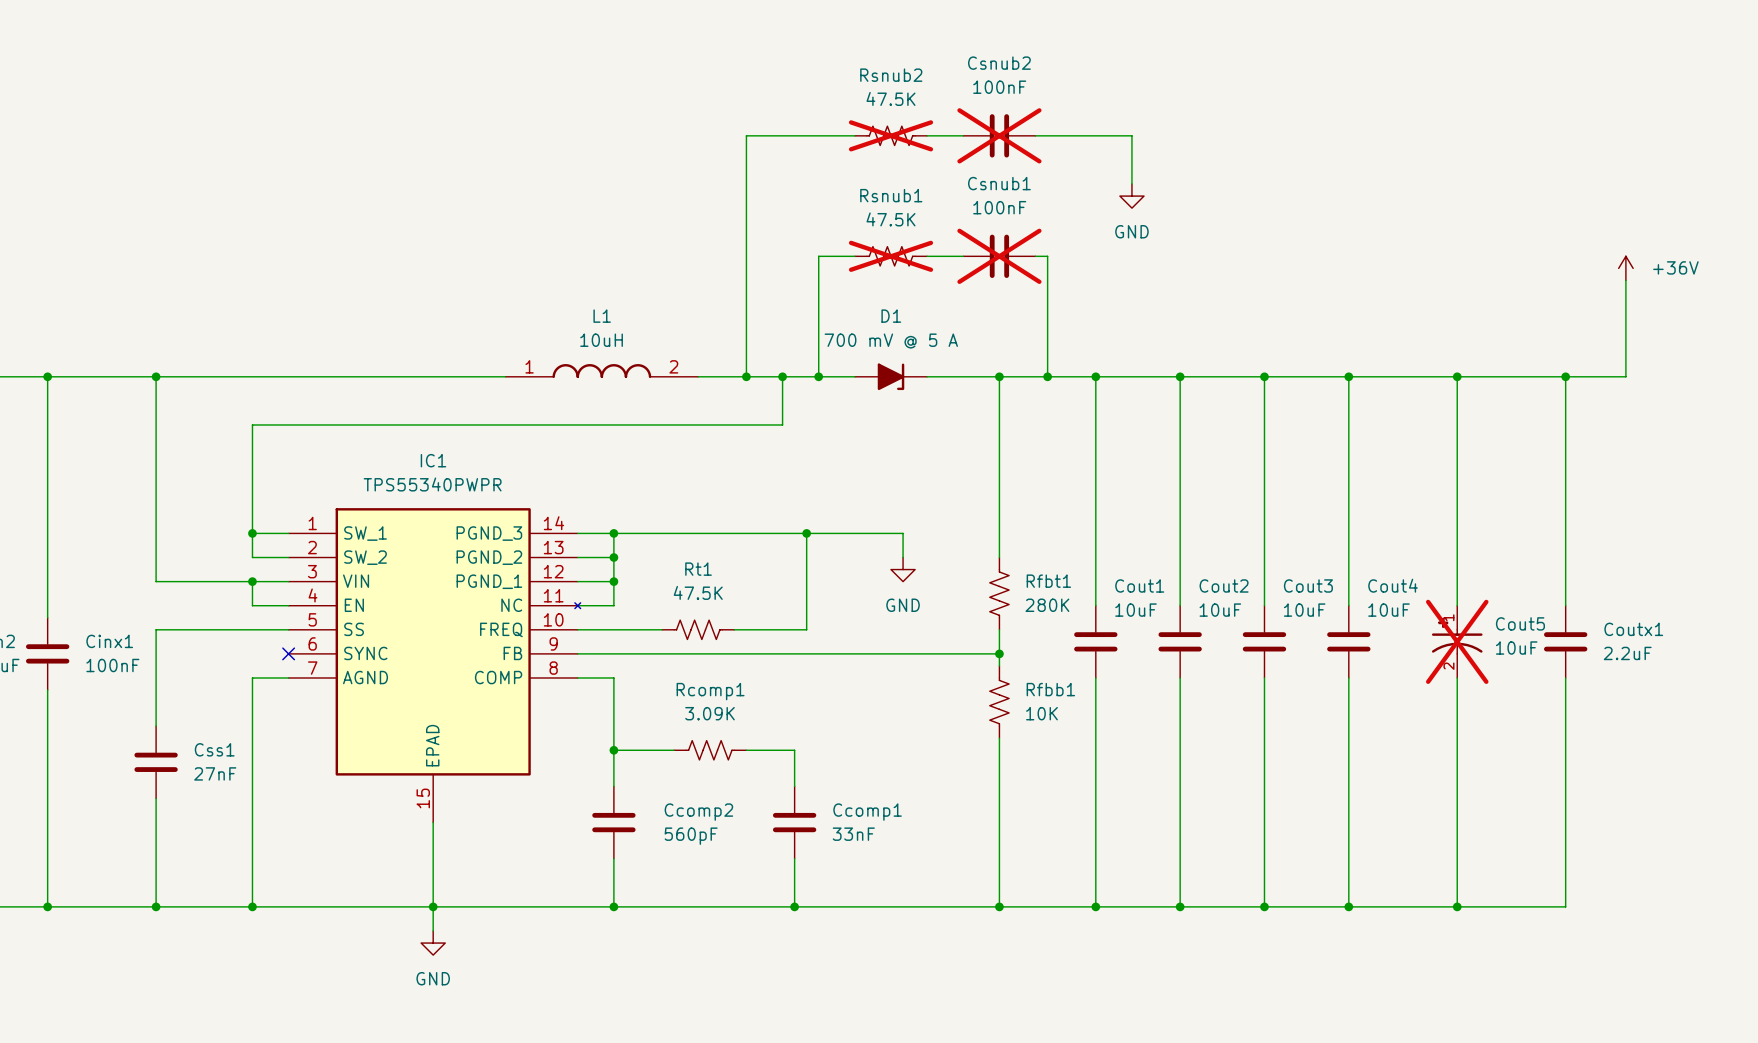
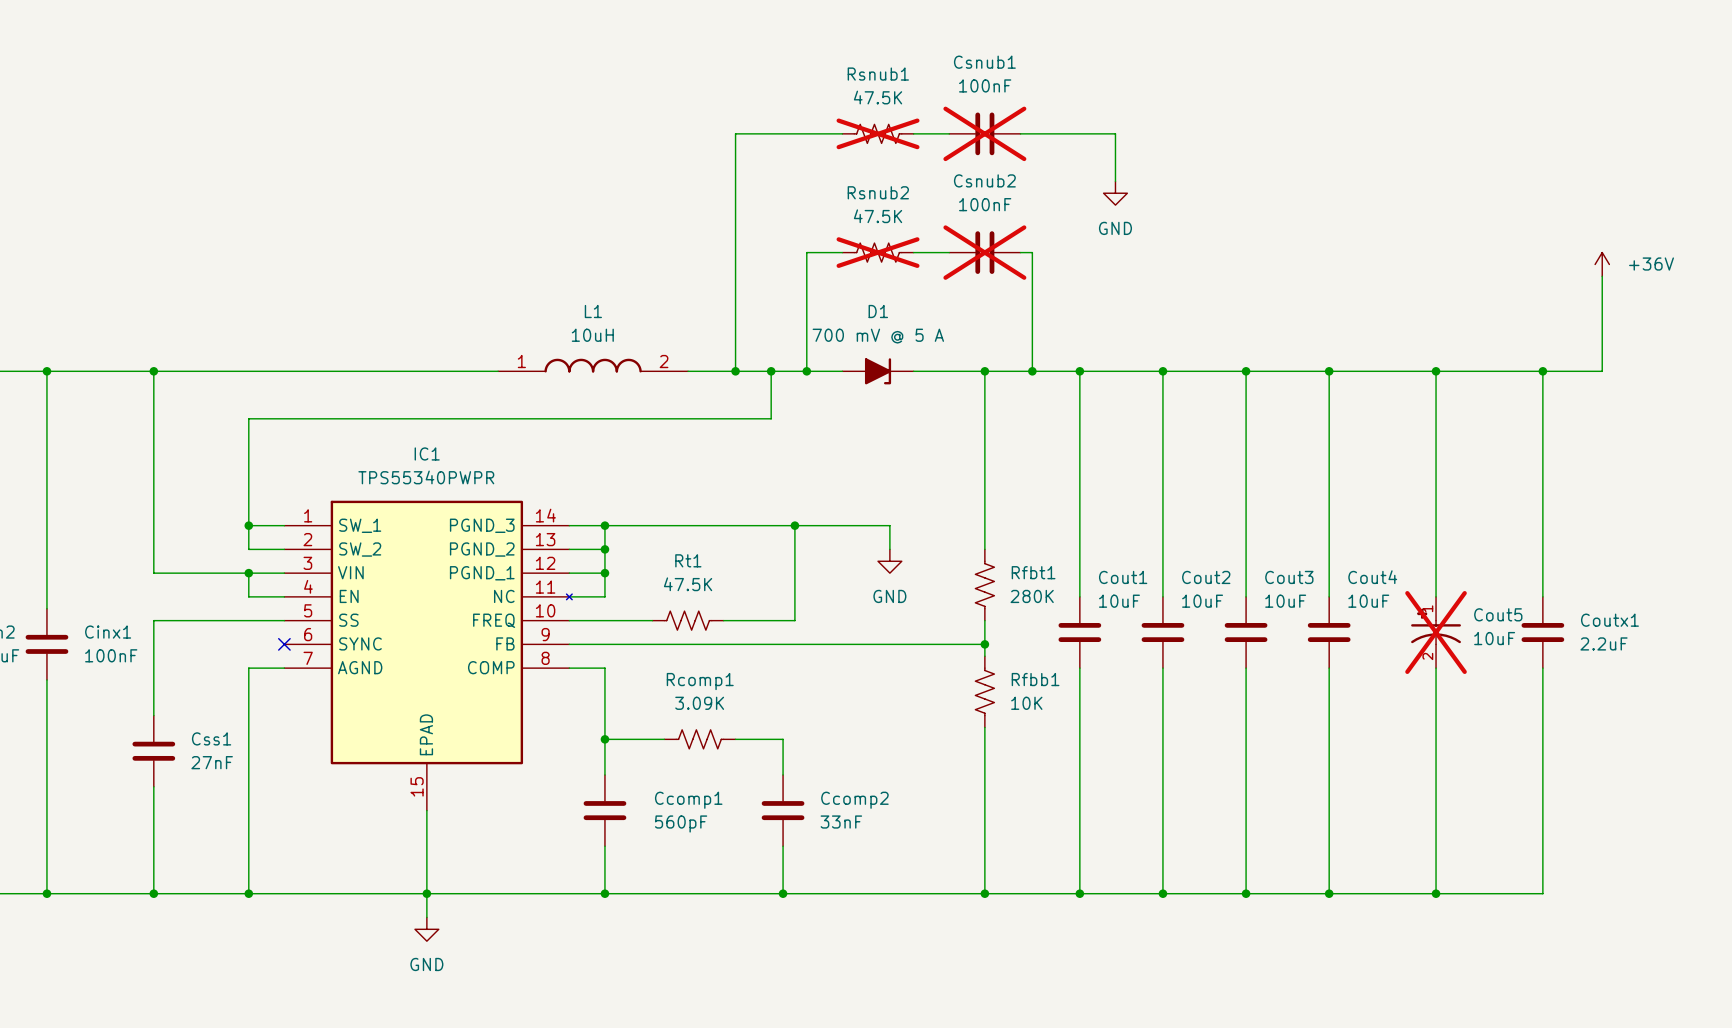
Csnub2 name: Csnub2 (999, 63) -> Csnub1 (984, 62)
Rsnub2 name: Rsnub2 (891, 75) -> Rsnub1 (878, 74)
Csnub1 name: Csnub1 (999, 183) -> Csnub2 (984, 180)
Rsnub1 name: Rsnub1 (891, 195) -> Rsnub2 (878, 192)
Ccomp2 name: Ccomp2 (698, 812) -> Ccomp1 (688, 800)
Ccomp1 name: Ccomp1 (867, 812) -> Ccomp2 (854, 800)

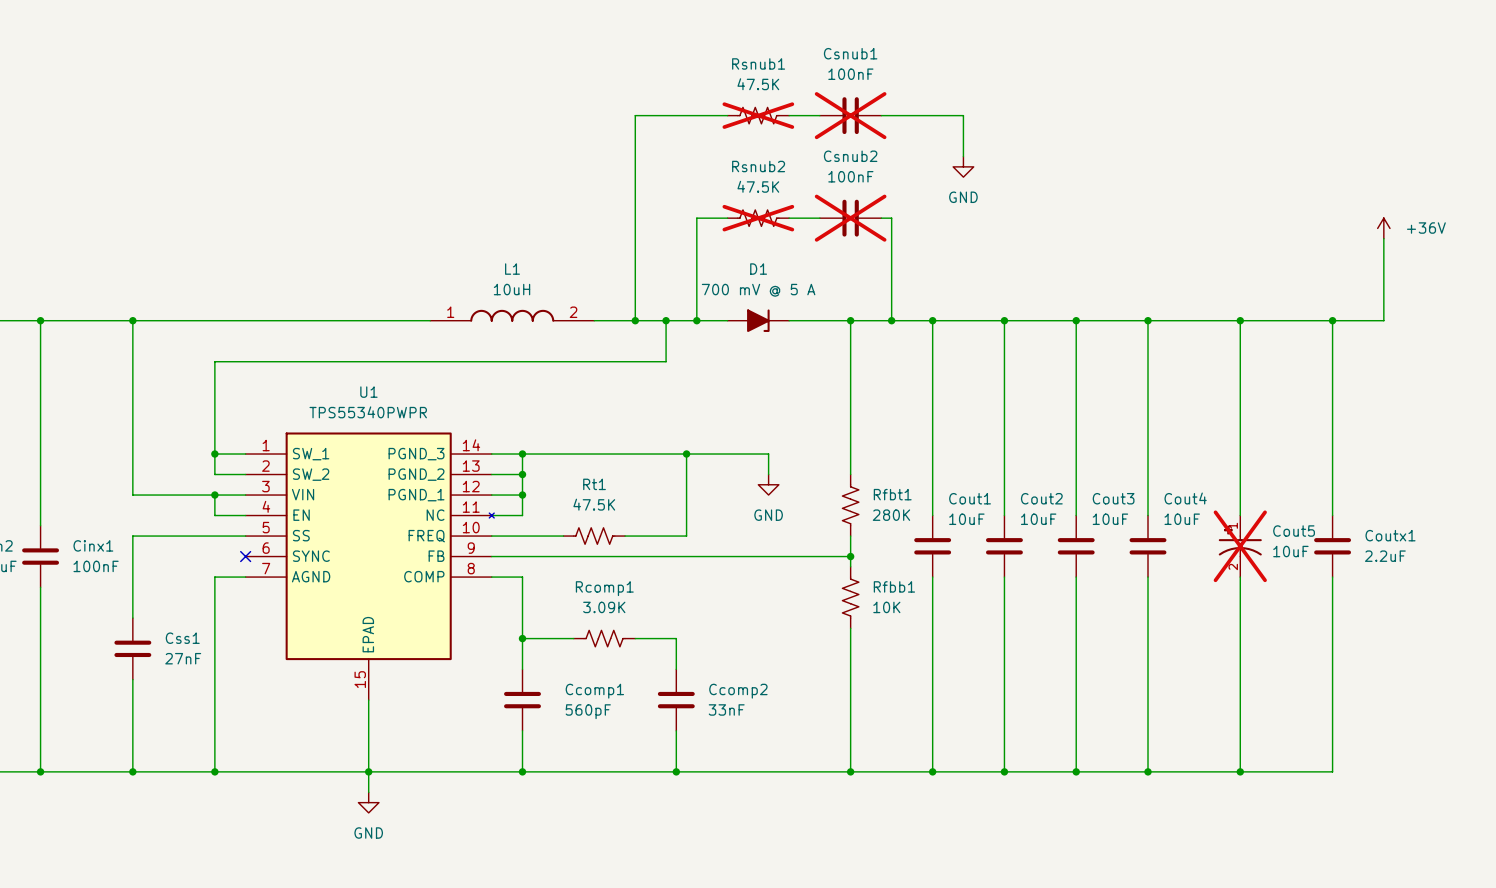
IC1 name: IC1 (427, 453) -> U1 (368, 392)

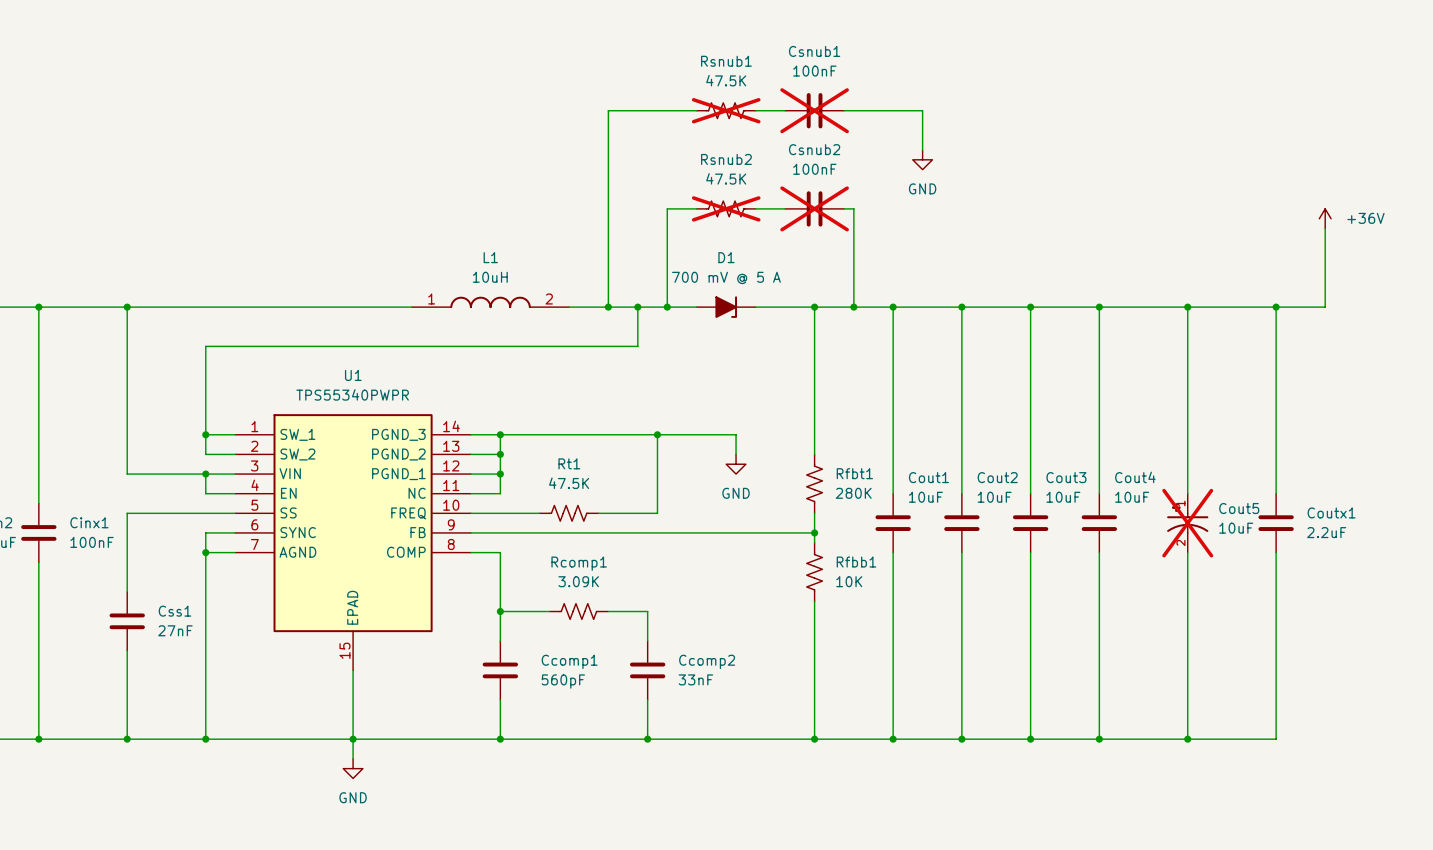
U1 symbol: [245, 432, 495, 701] -> [235, 414, 471, 671]
wire: none -> (235, 532) (205, 532) (205, 552)
no-connect mark: (245, 556) -> none
junction: none -> (205, 552)

